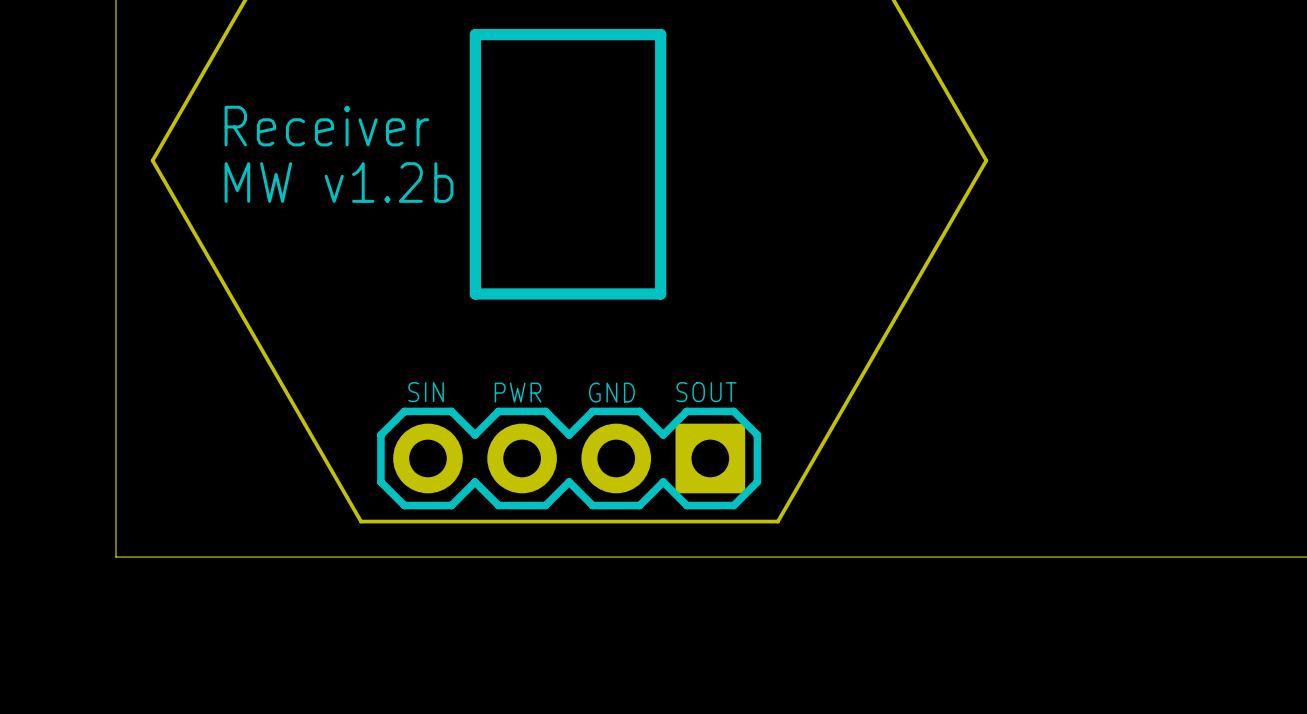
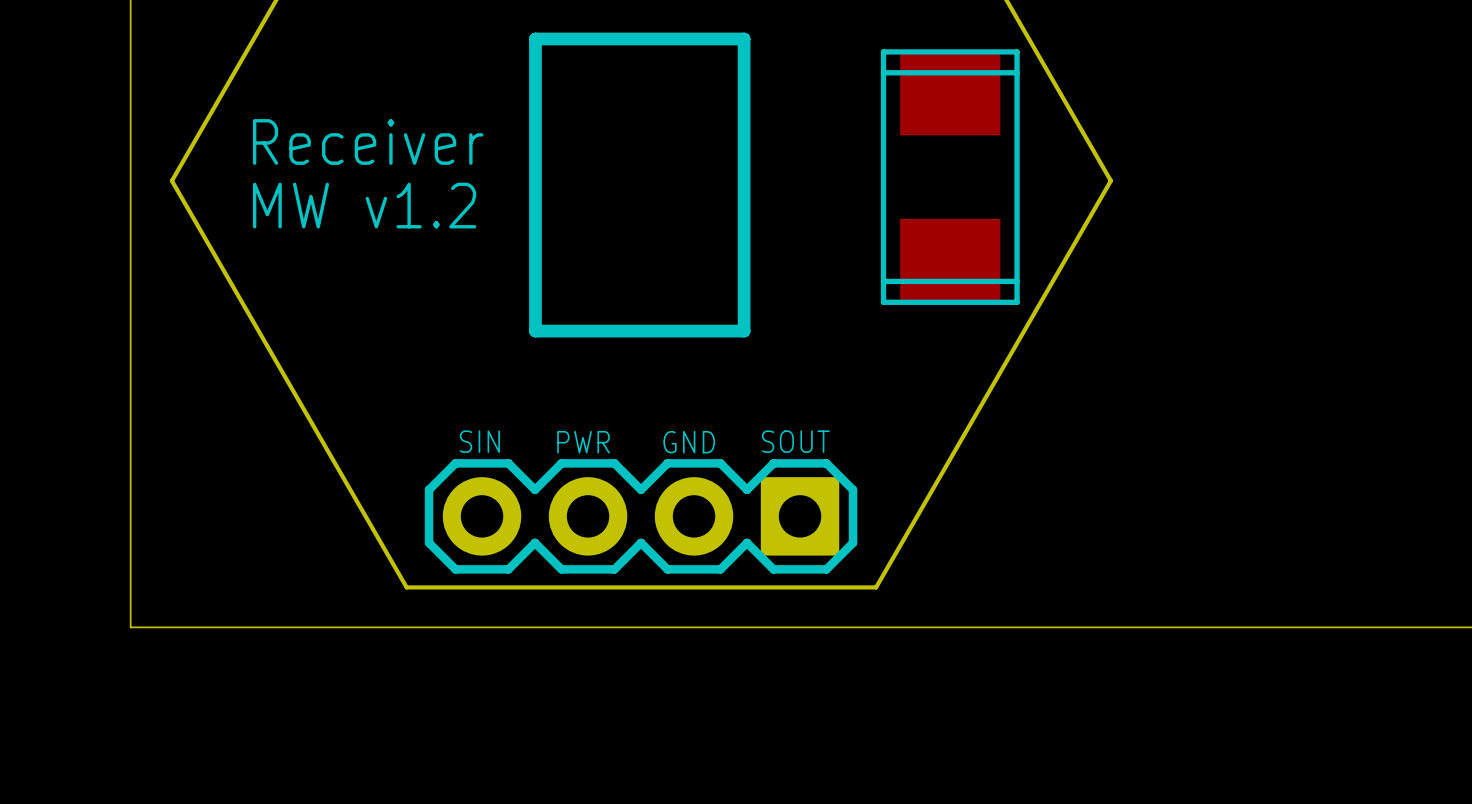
part: none -> (950, 177)
text: MW v1.2b (339, 182) -> MW v1.2 (364, 205)

